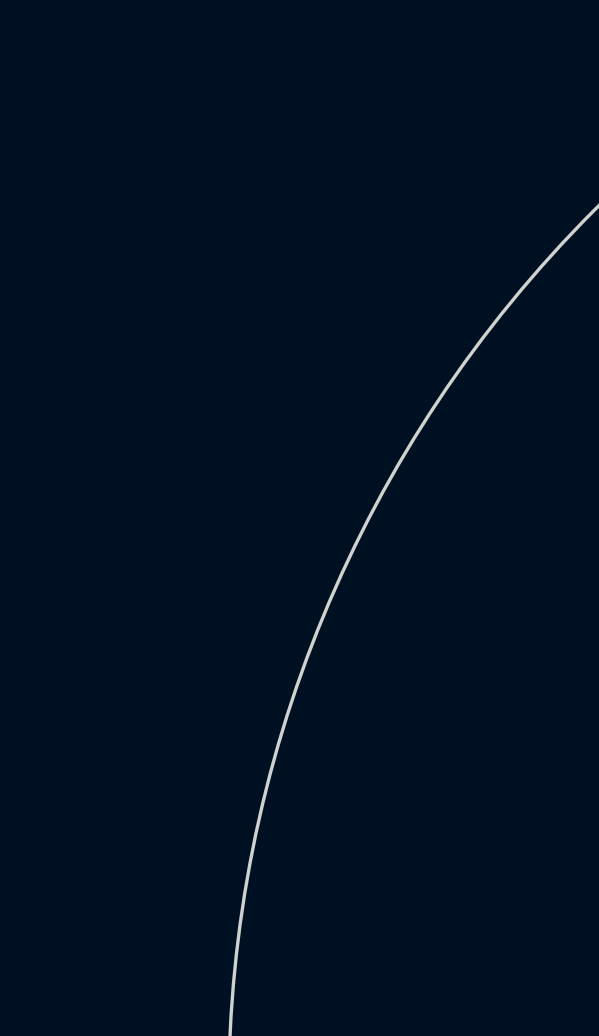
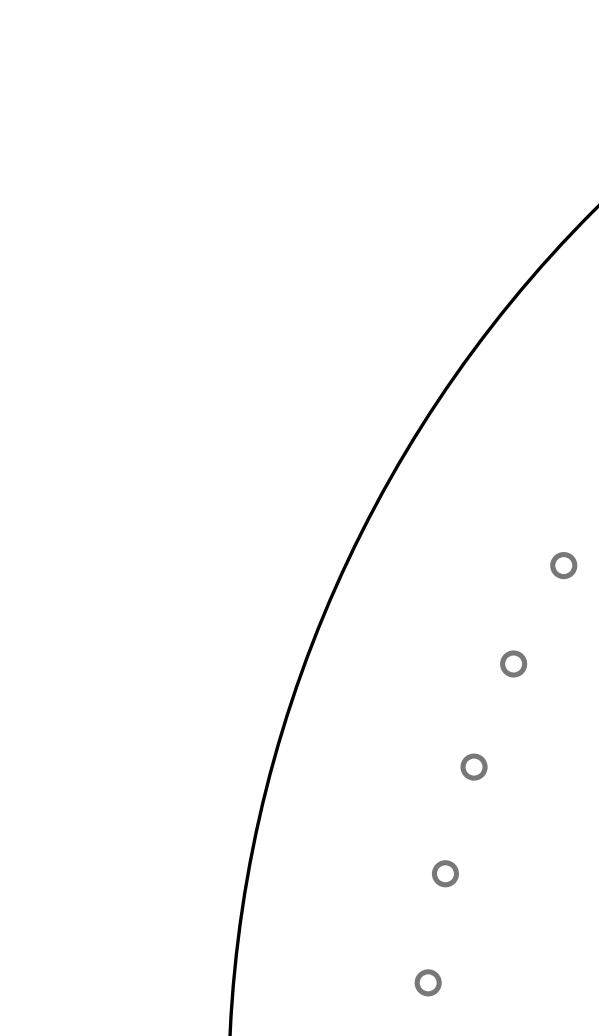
via: none -> (563, 565)
via: none -> (513, 663)
via: none -> (474, 767)
via: none -> (445, 873)
via: none -> (428, 982)

